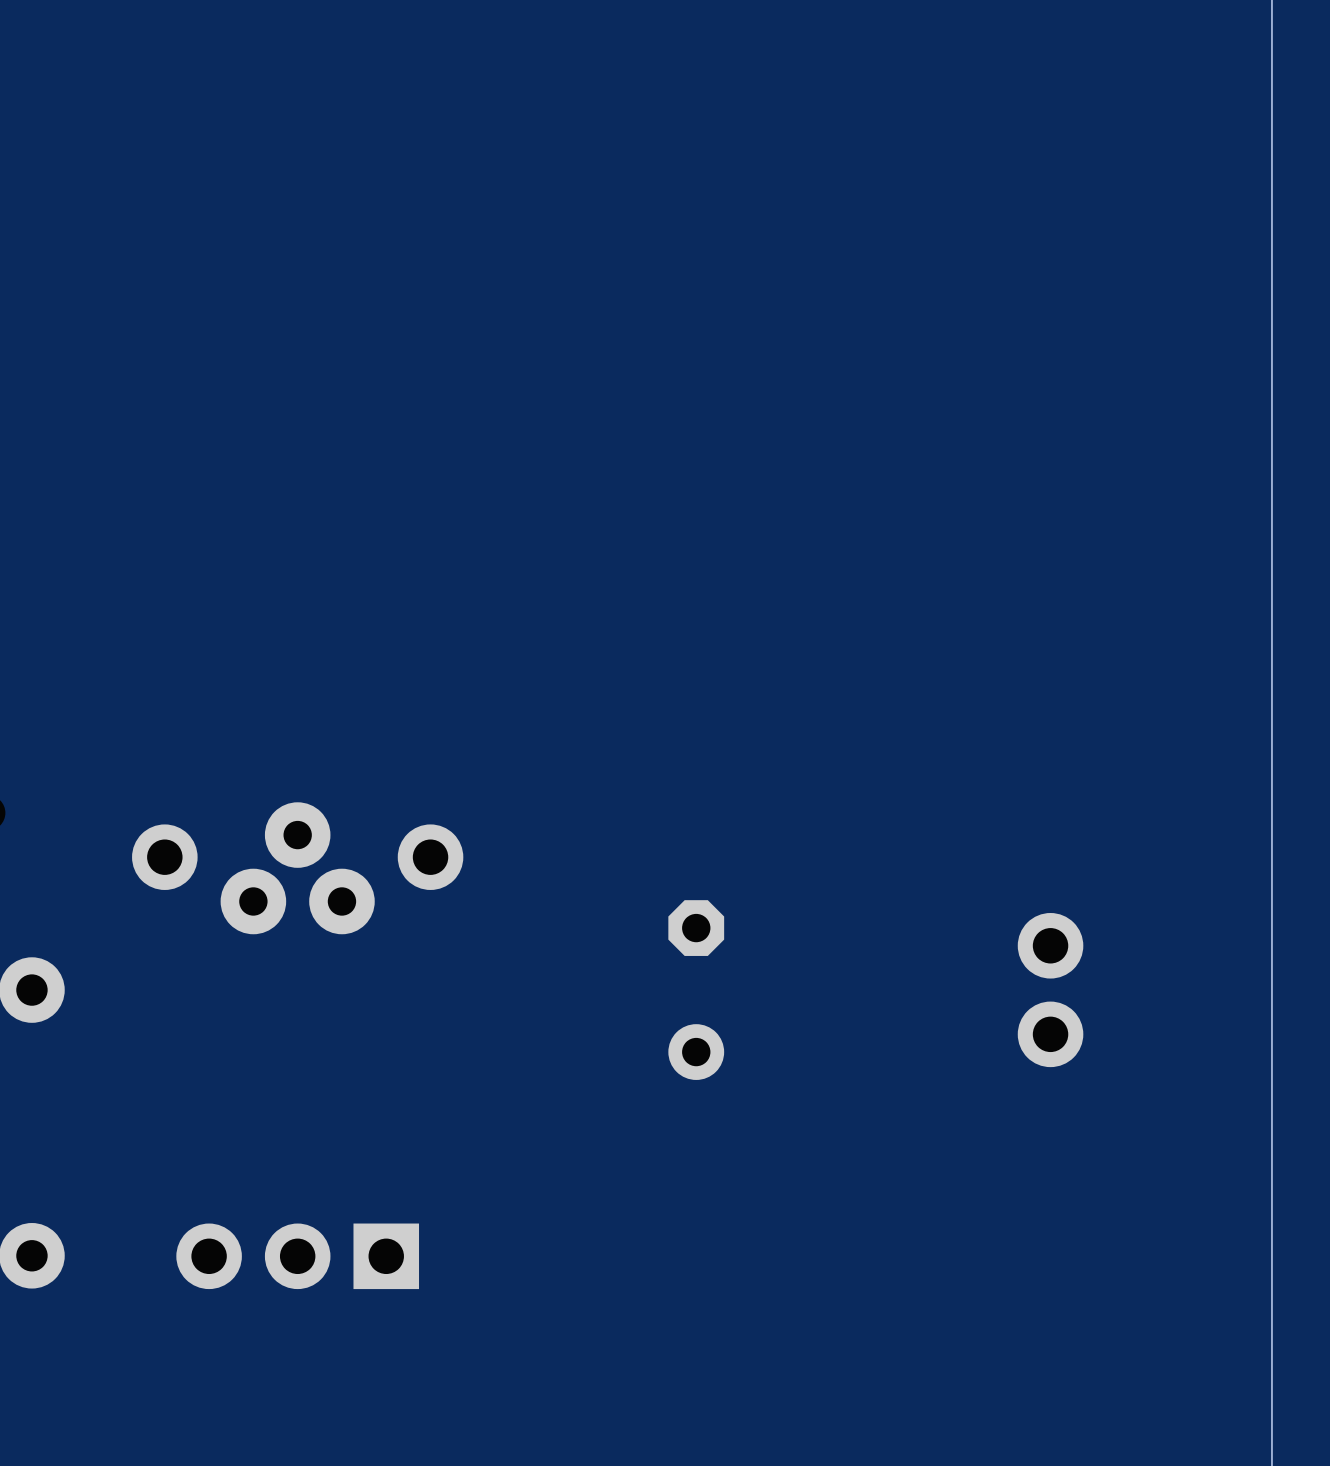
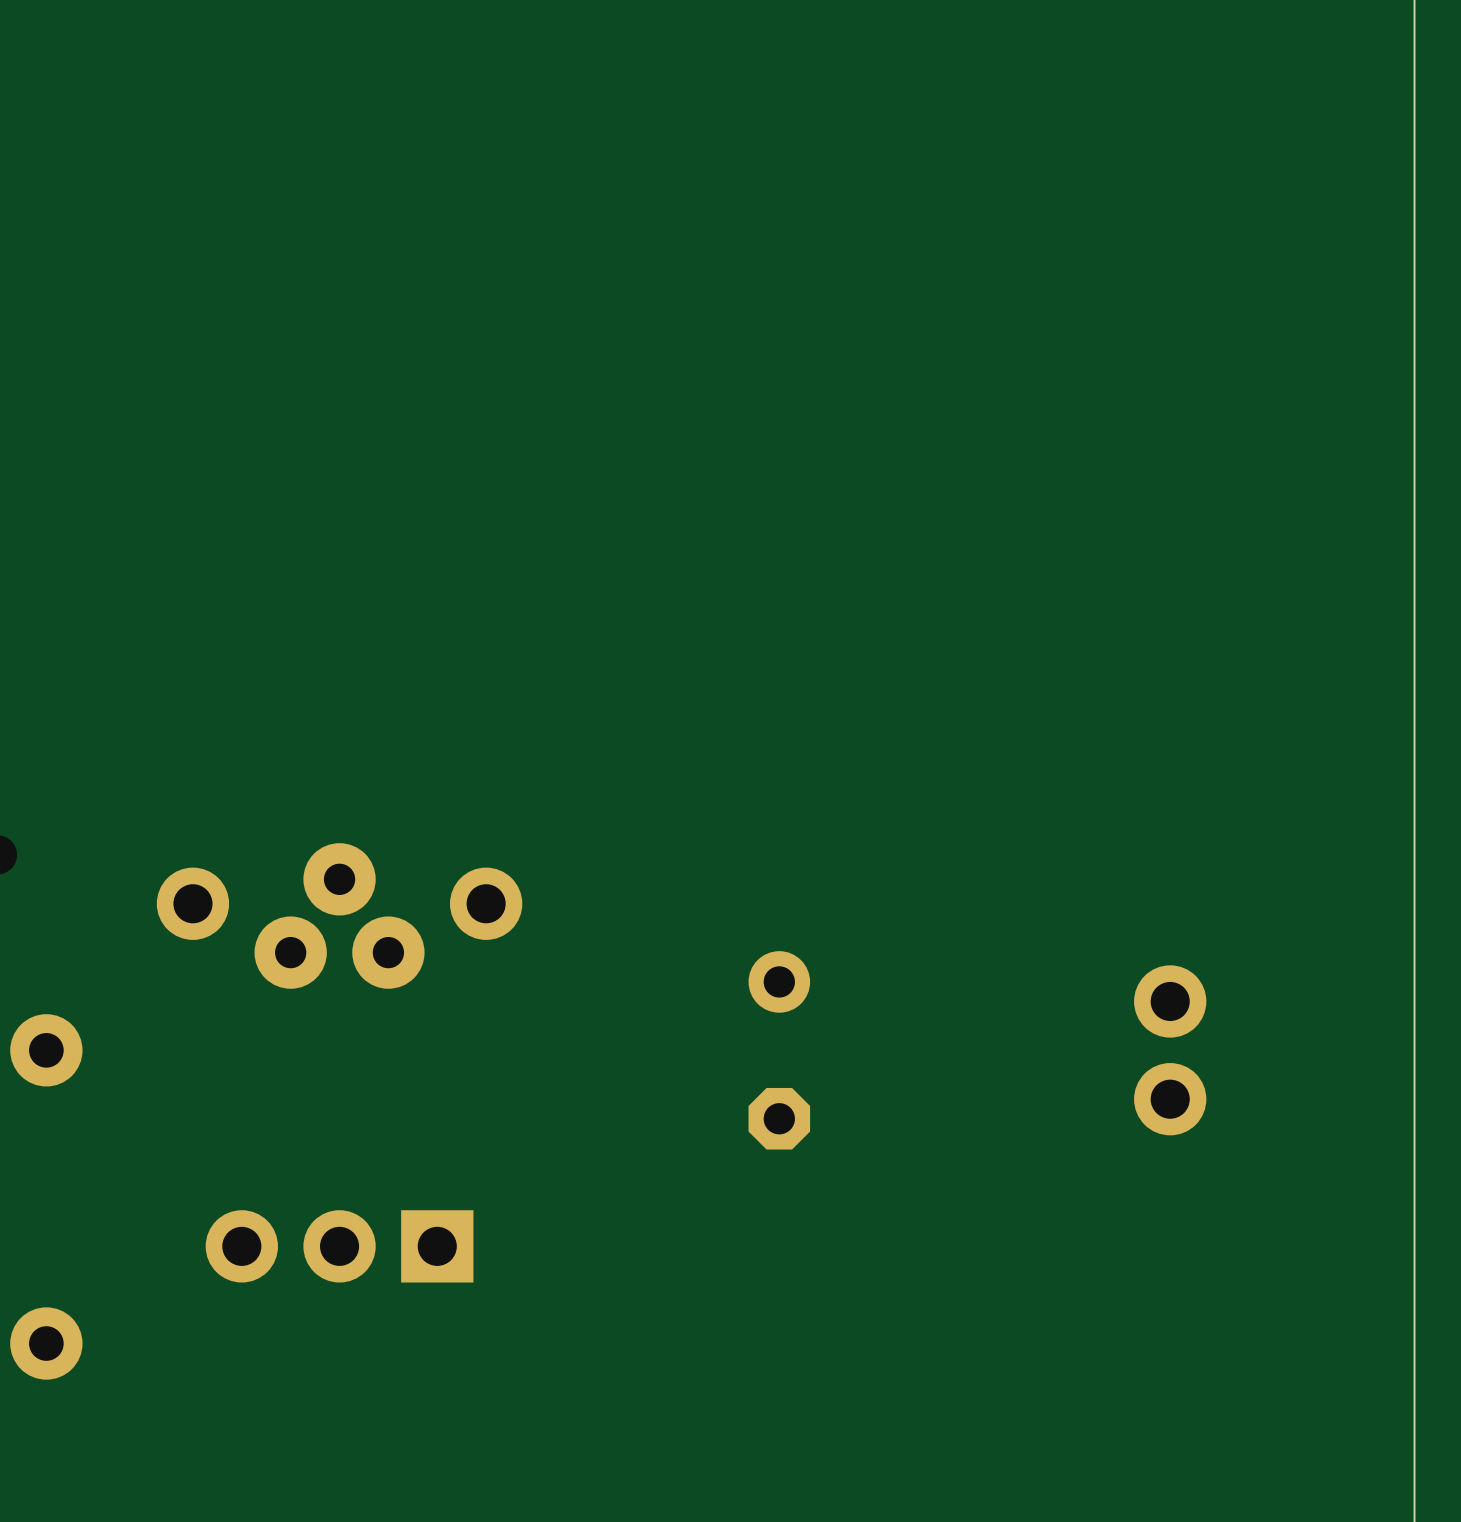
part rotation: 0° (696, 990) -> 180° (779, 1050)
part position: (297, 1256) -> (339, 1246)

